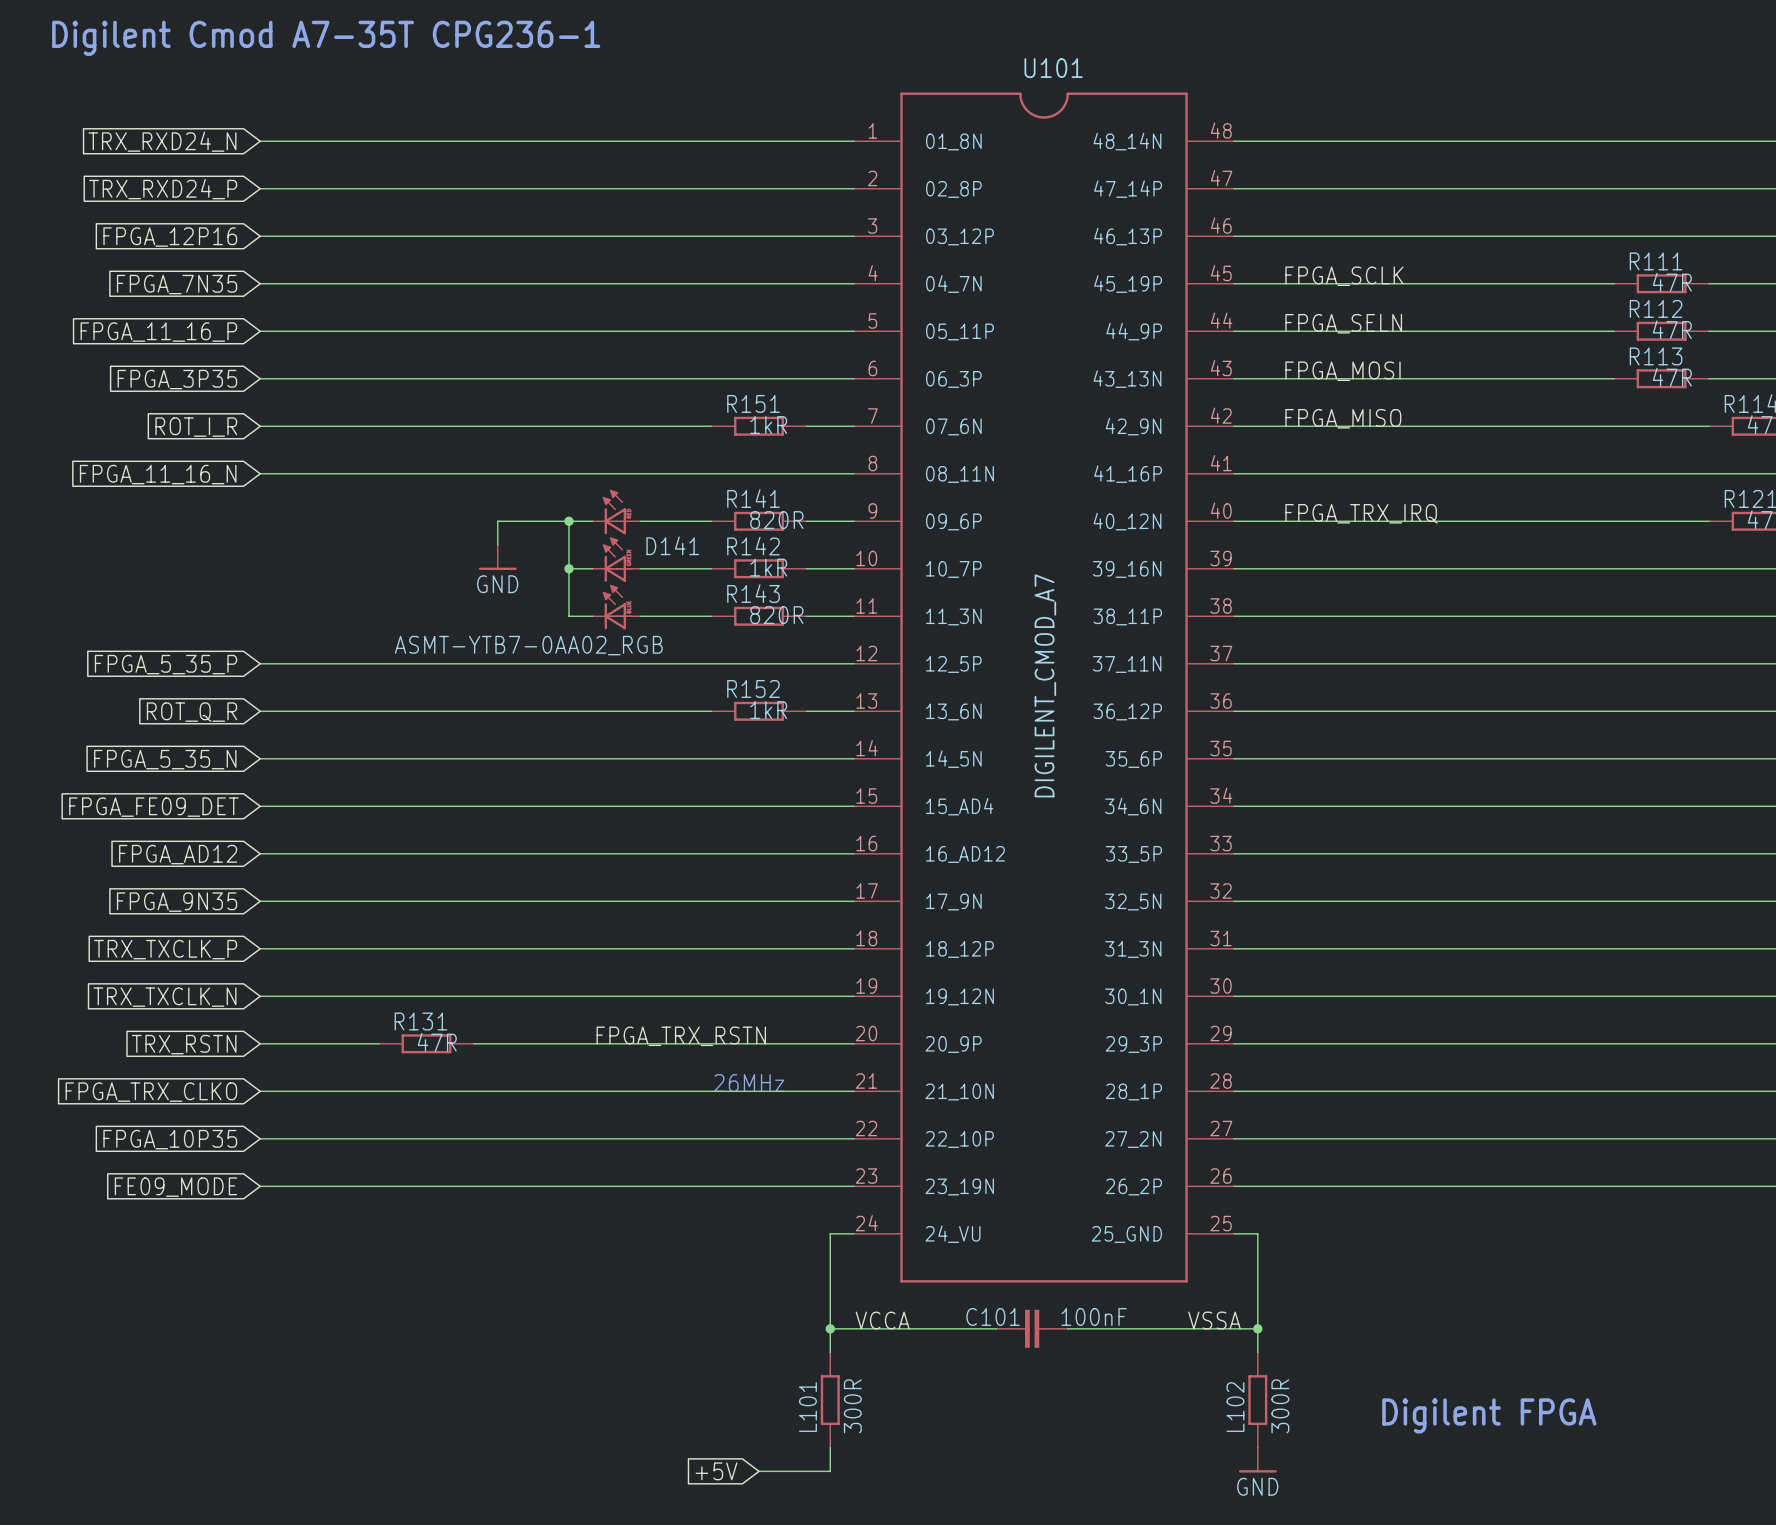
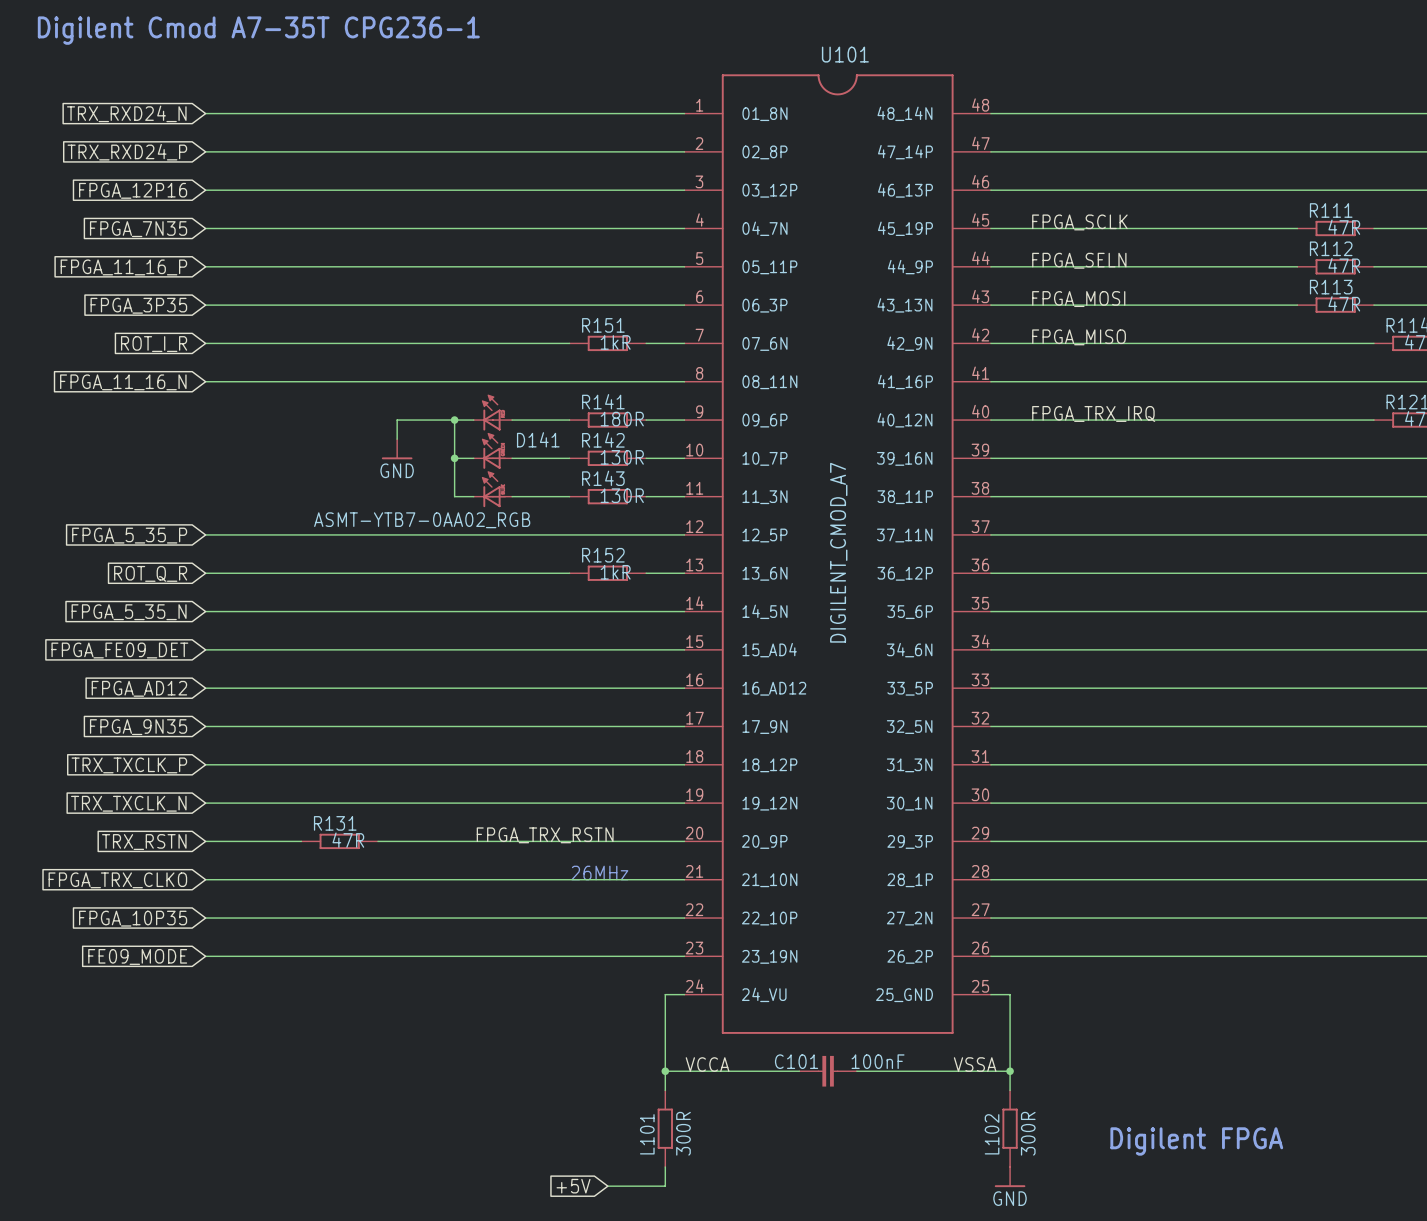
R141 value: 820R (776, 520) -> 180R (622, 419)
R142 value: 1kR (768, 567) -> 130R (622, 457)
R143 value: 820R (776, 615) -> 130R (622, 495)

